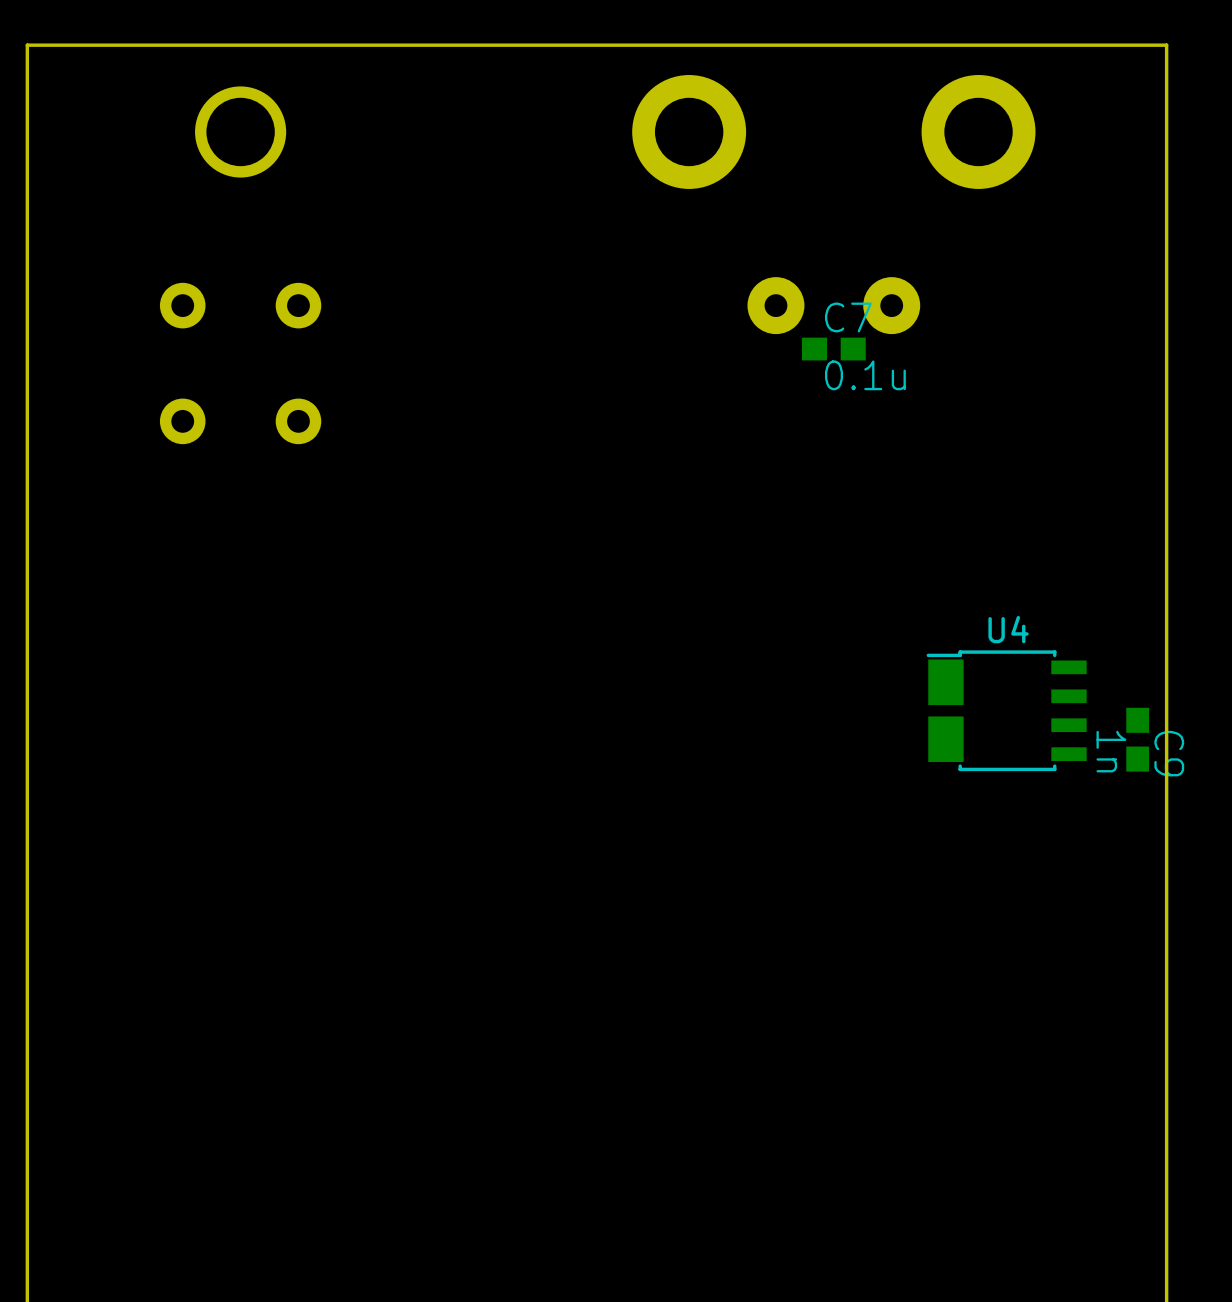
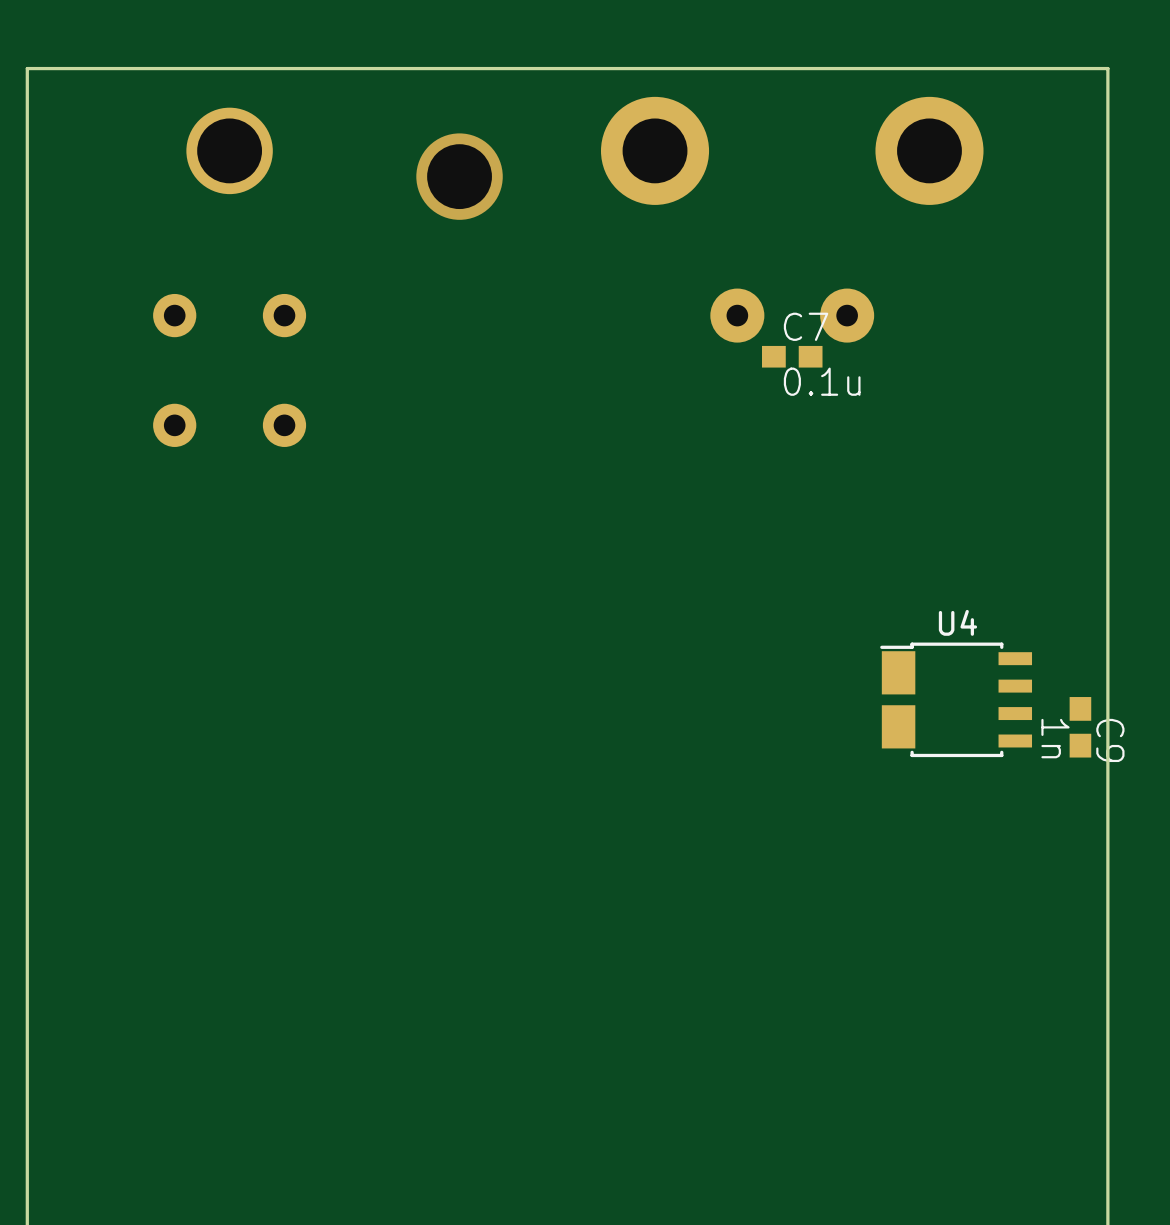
via: none -> (459, 176)

